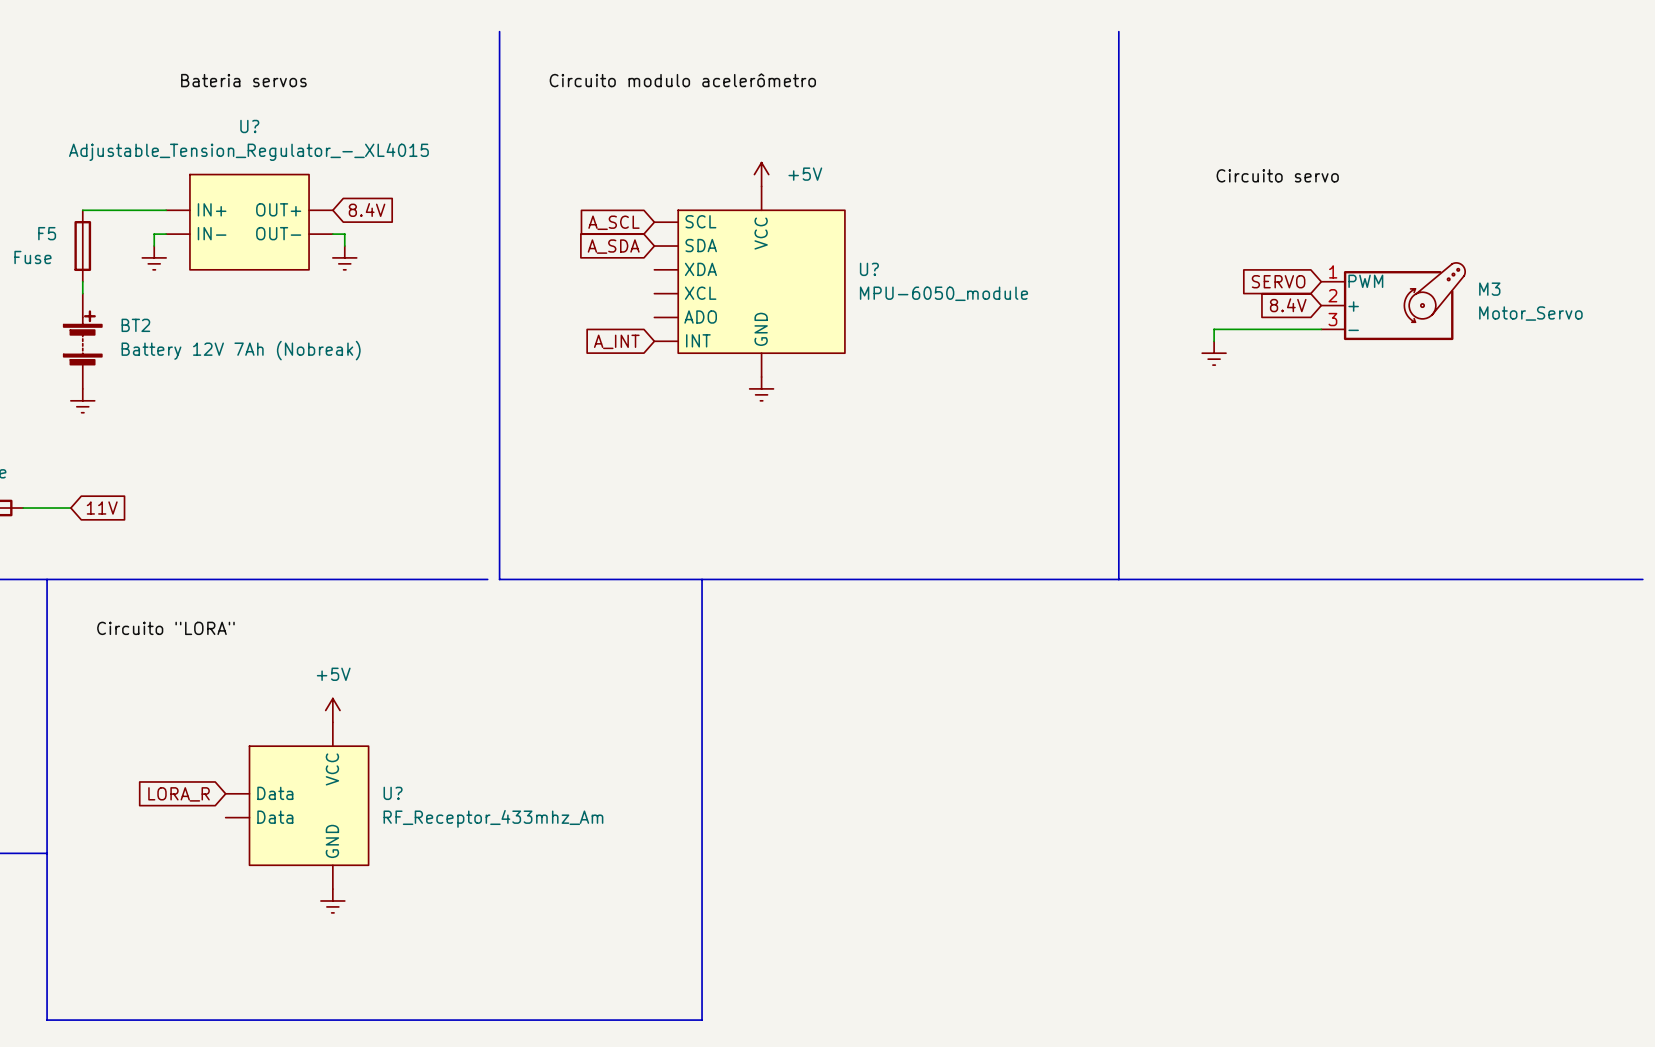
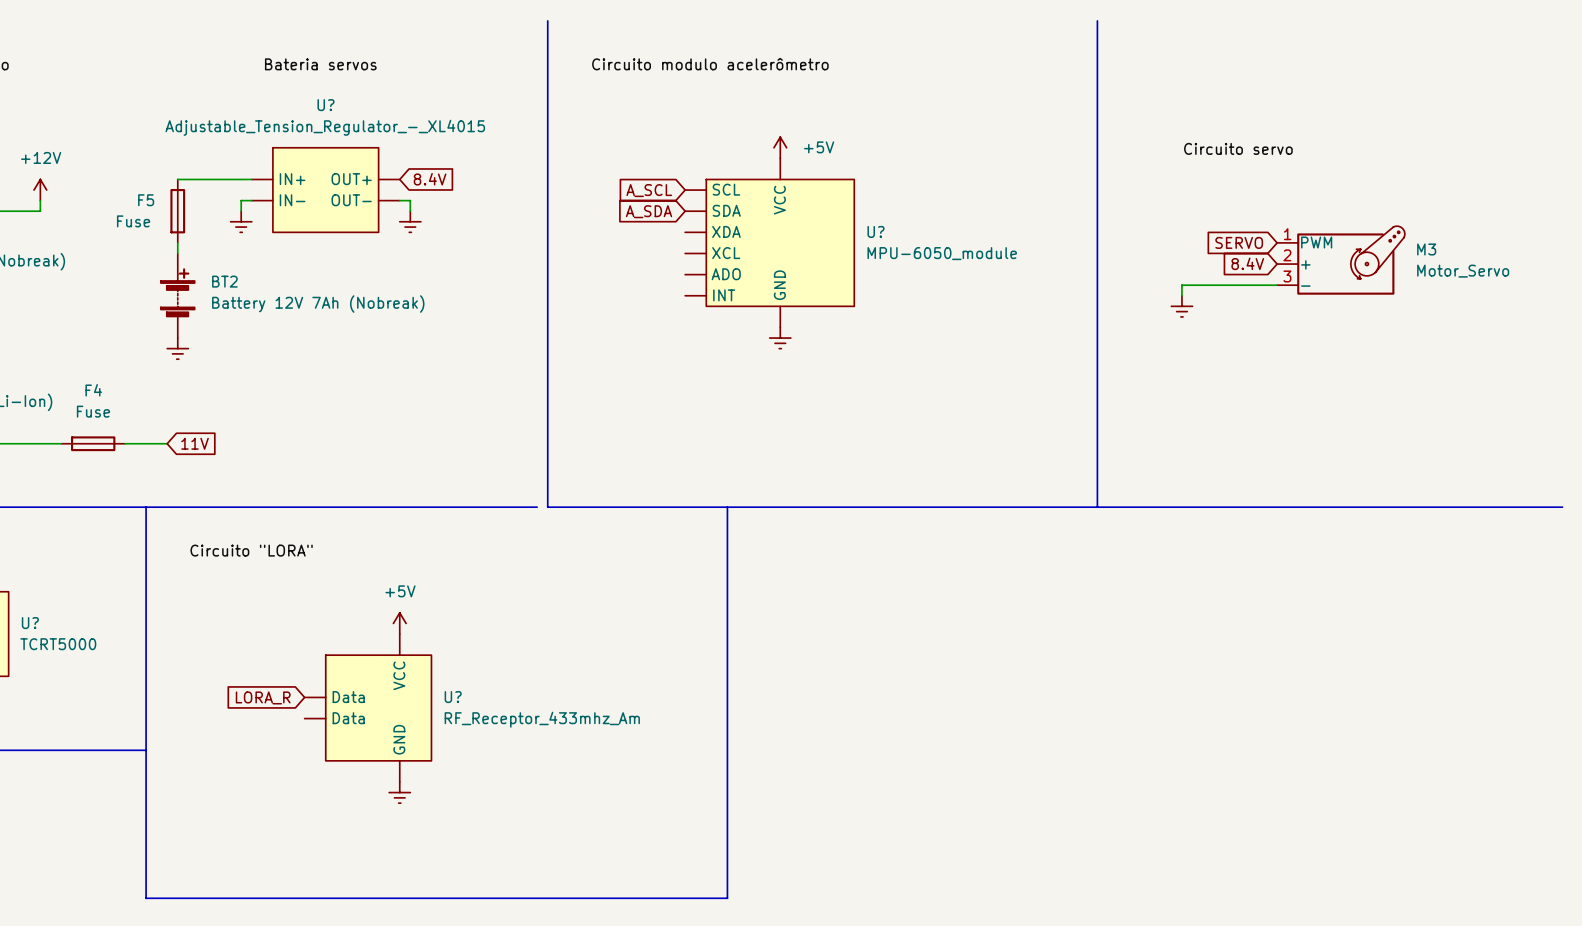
global label: A_INT (616, 341) -> none

